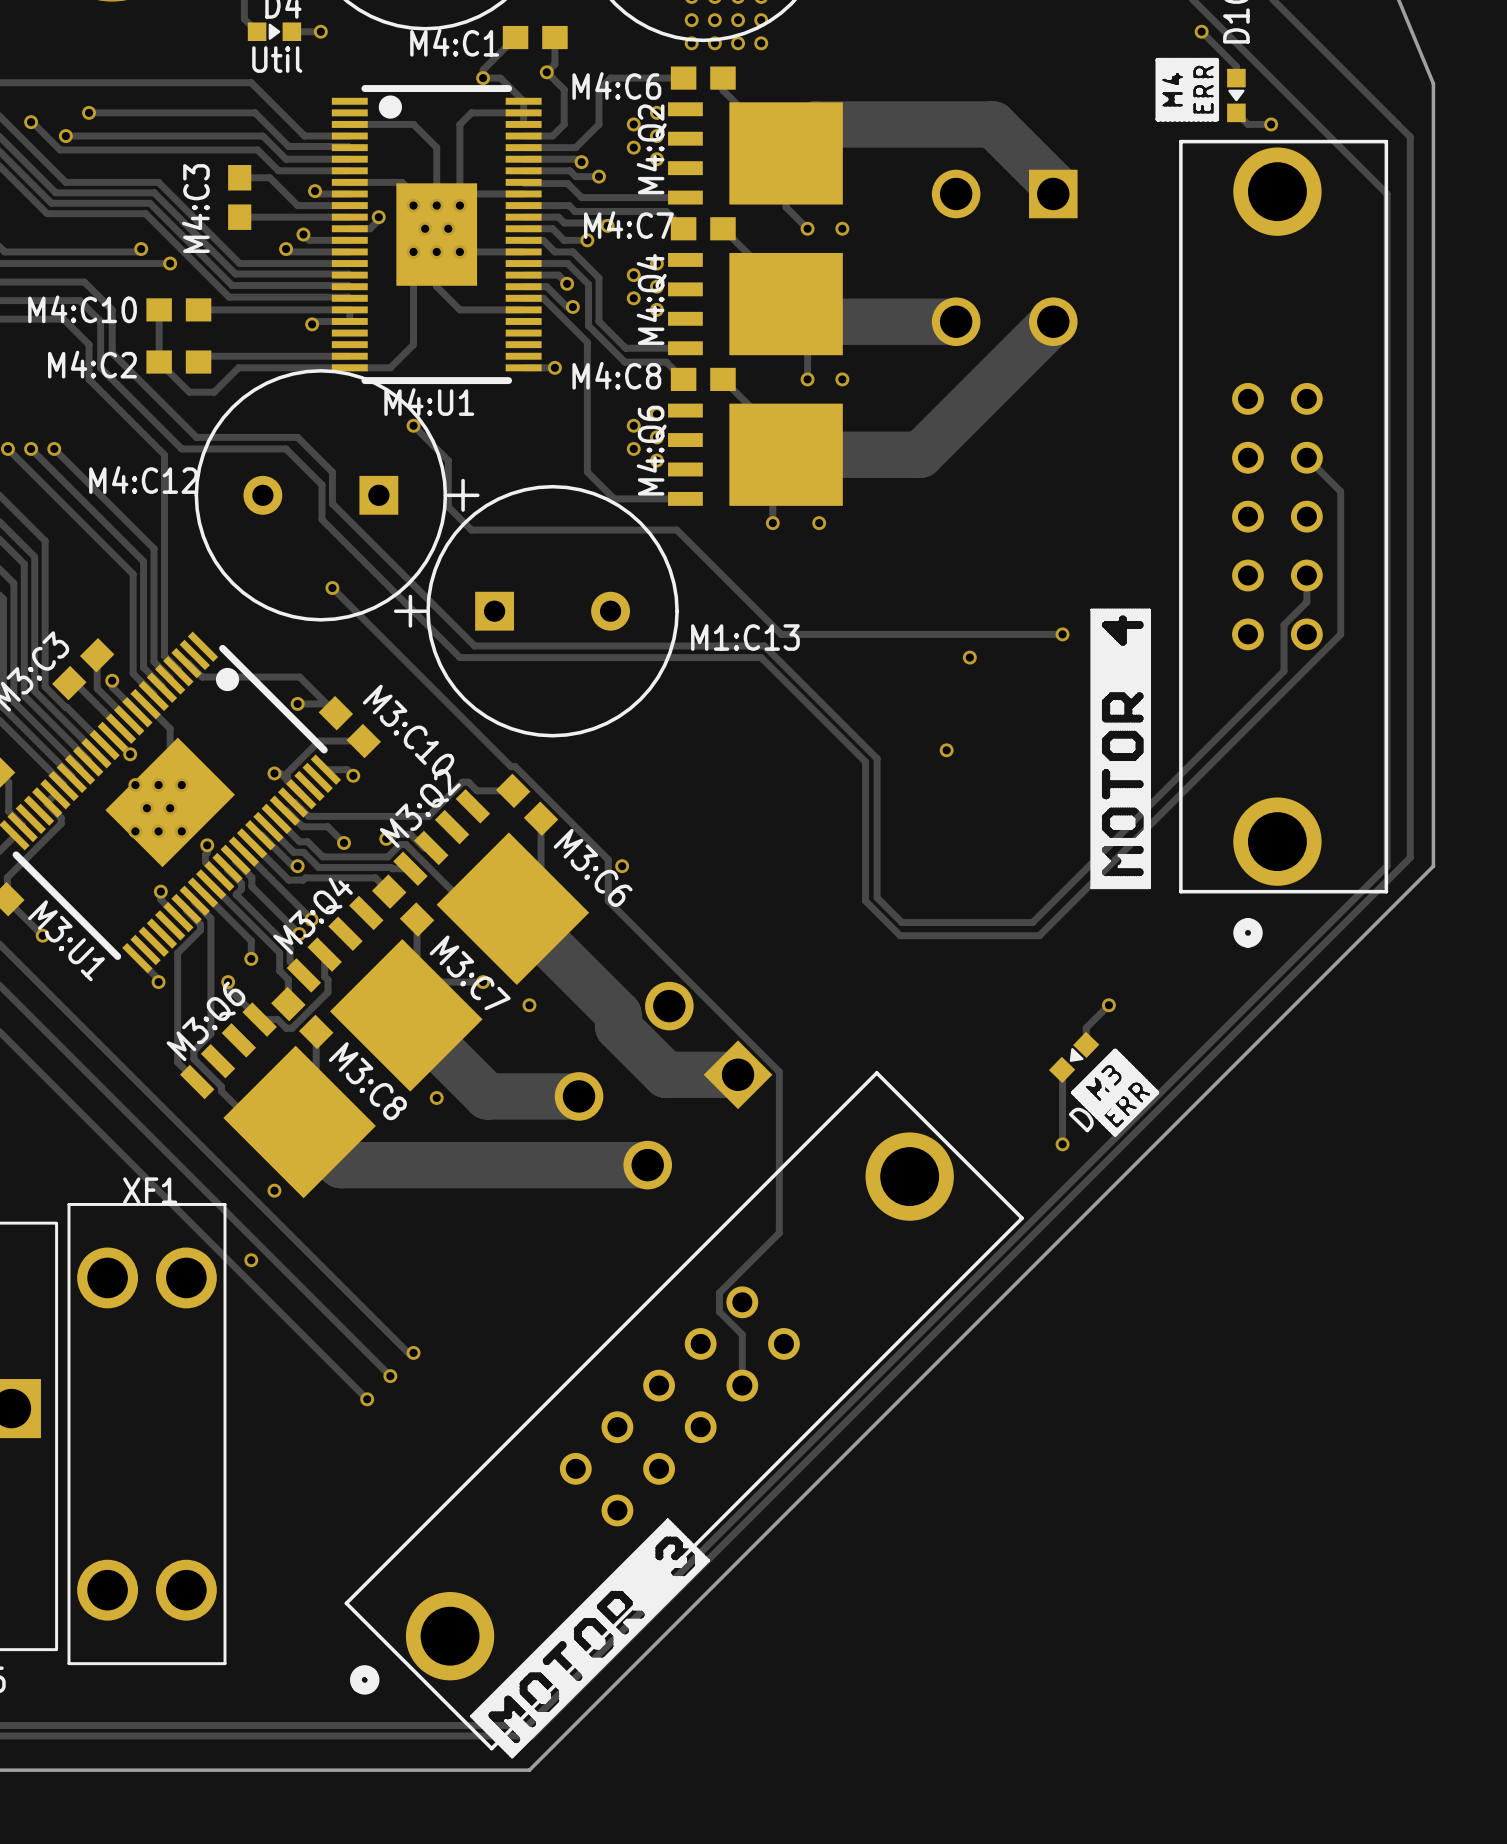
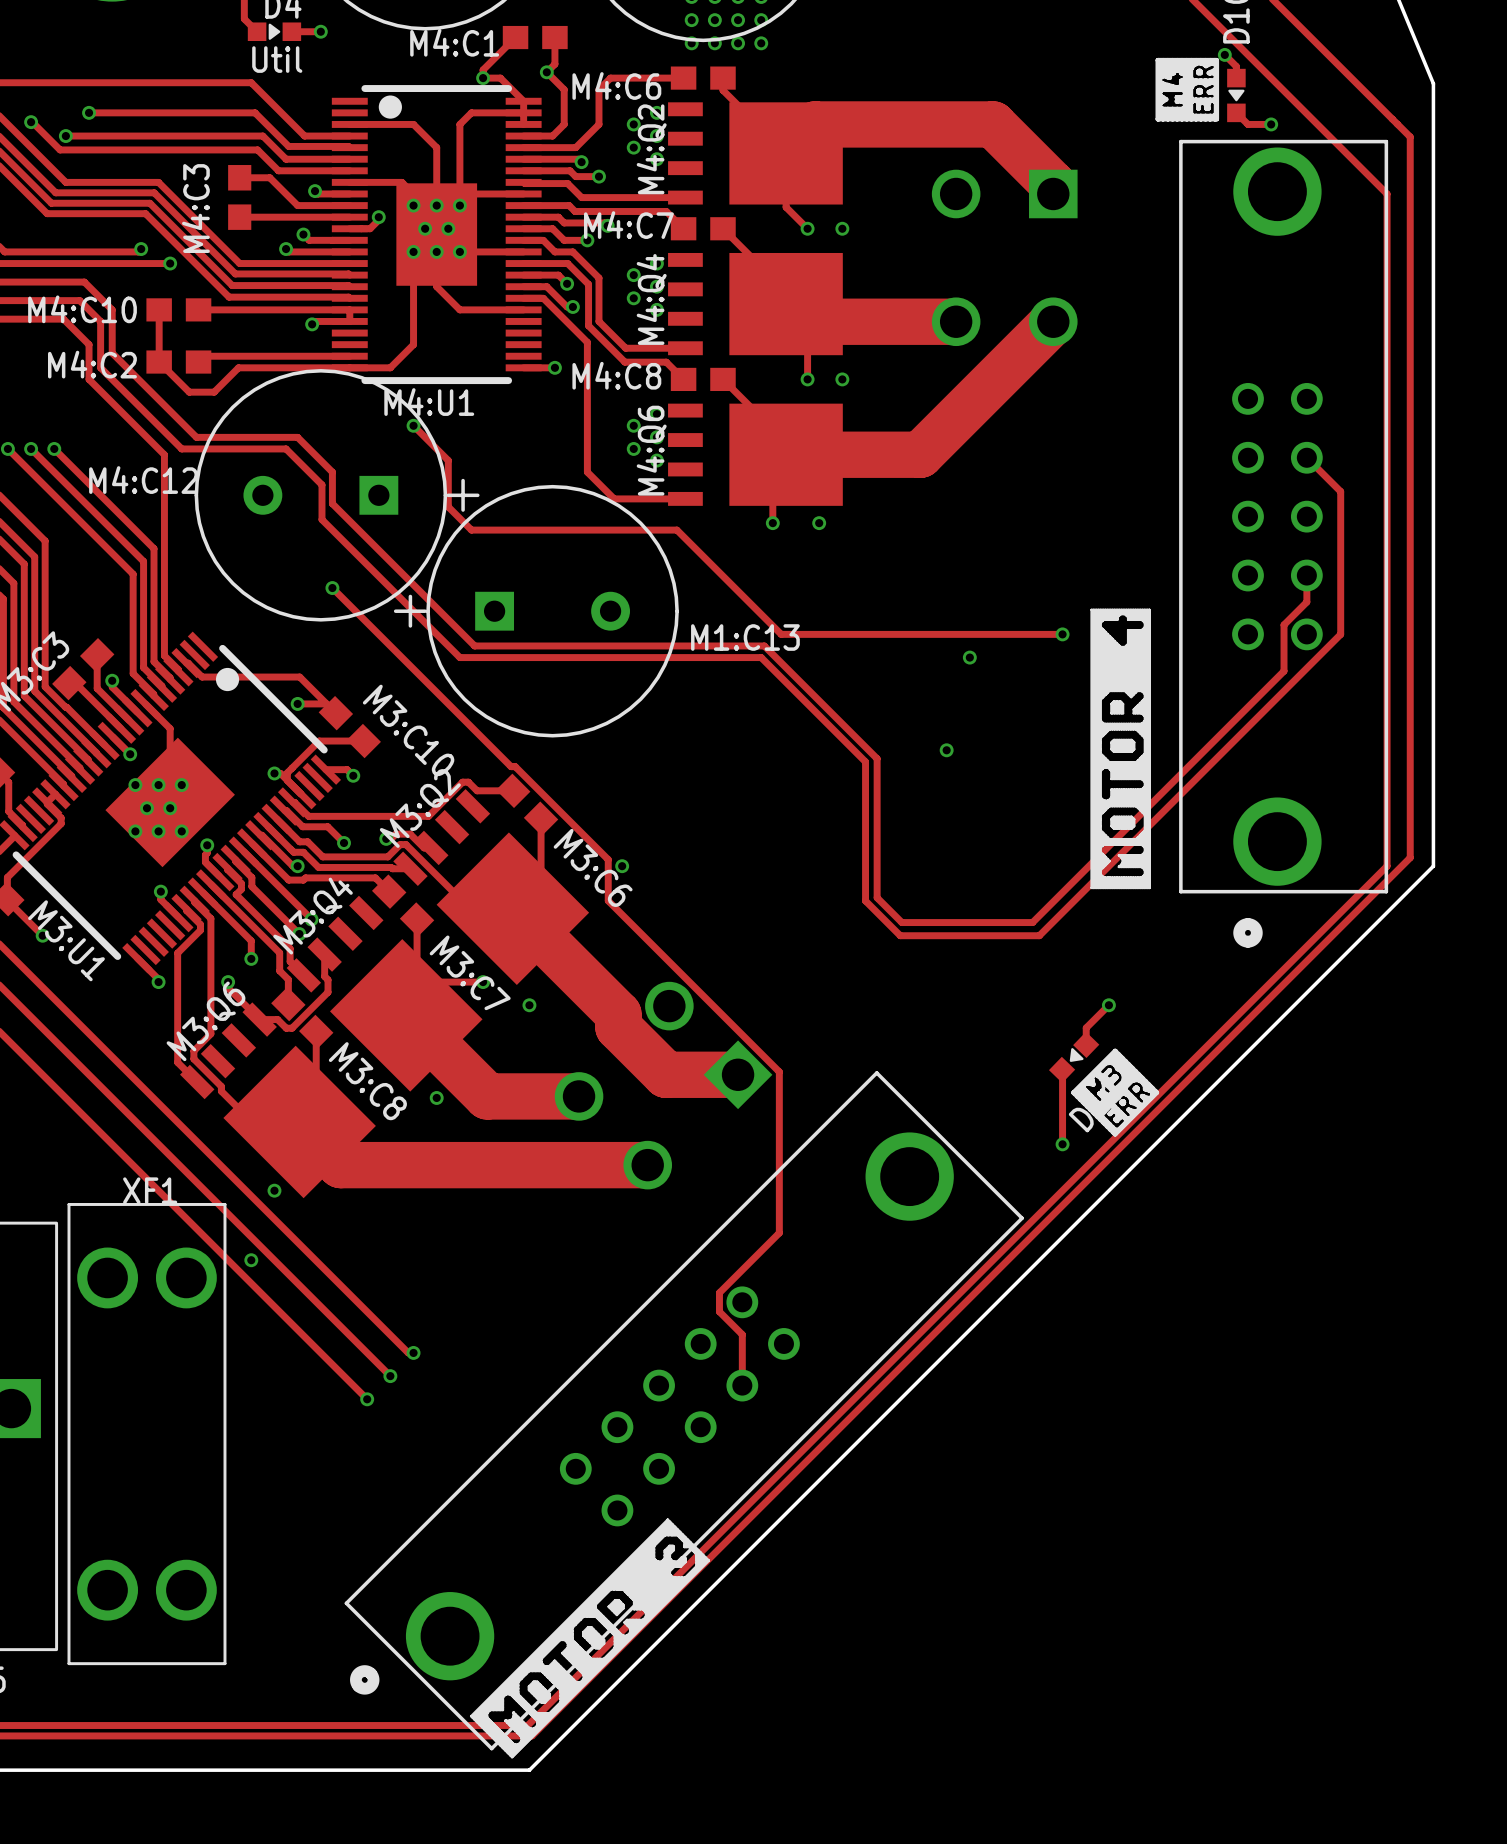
track: (1201, 31) (1224, 54) -> none
via position: (1201, 31) -> (1224, 54)

